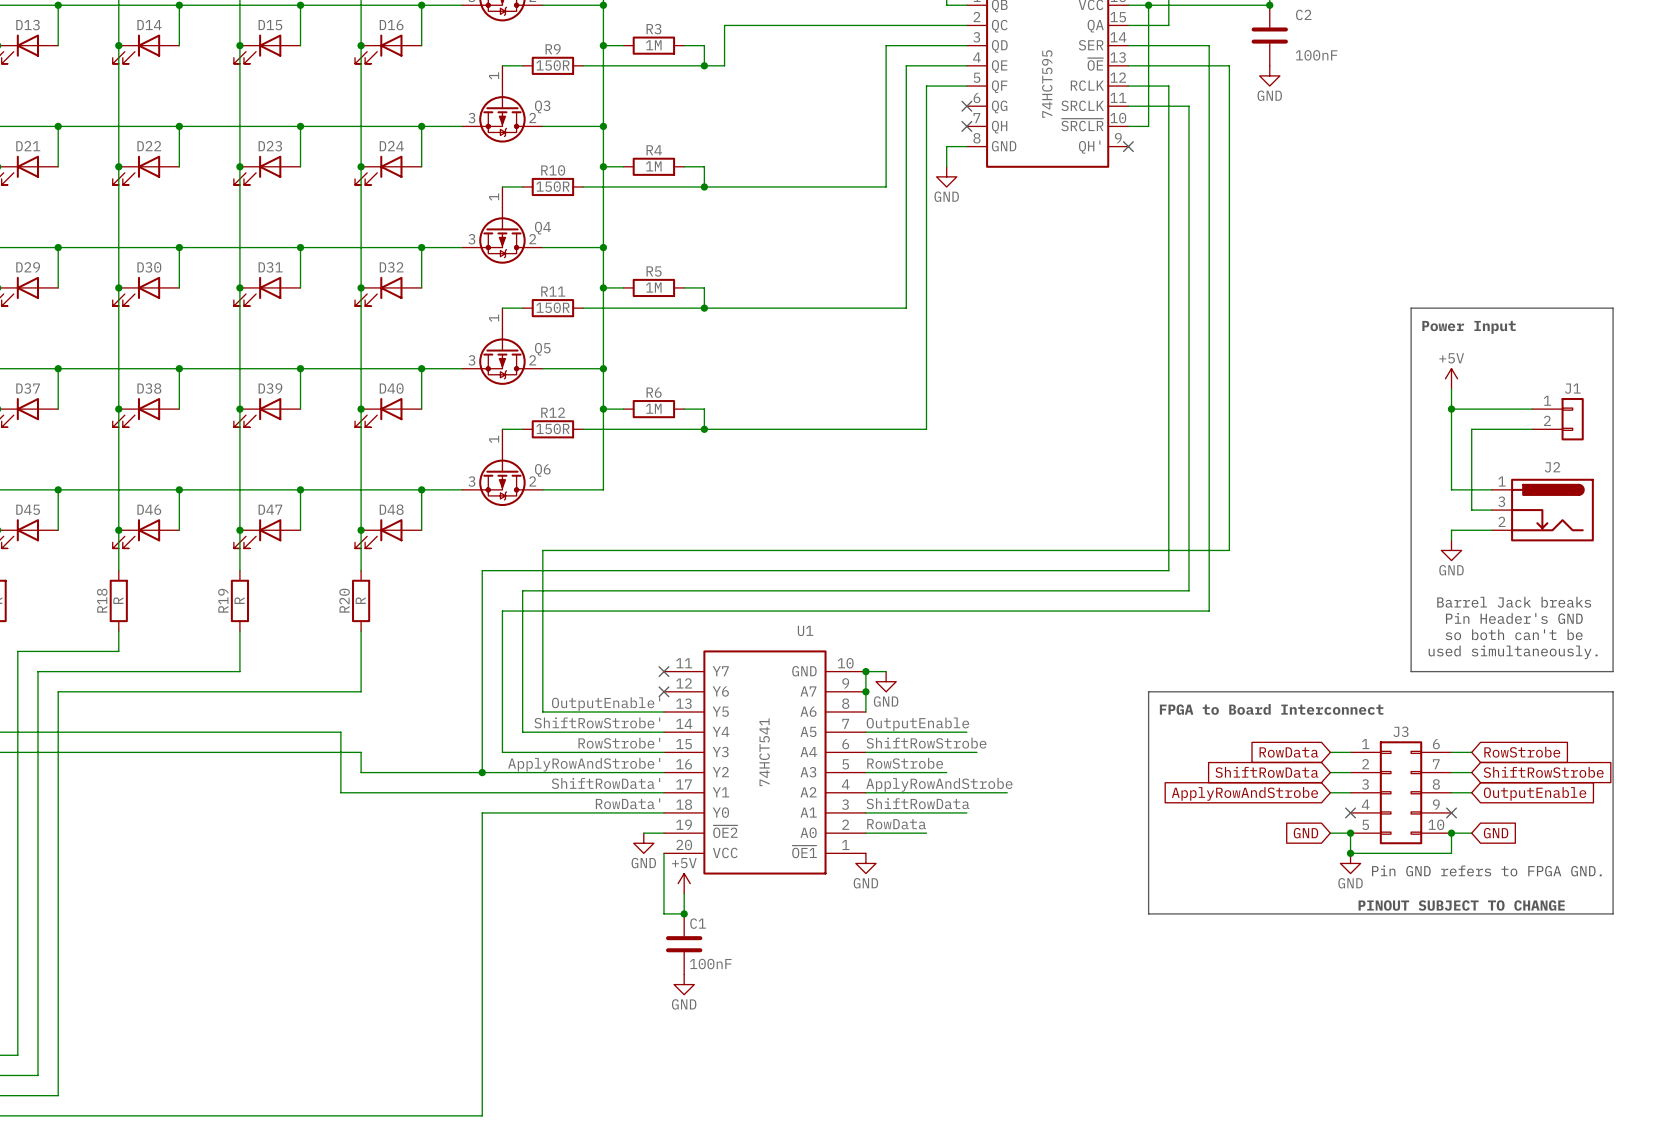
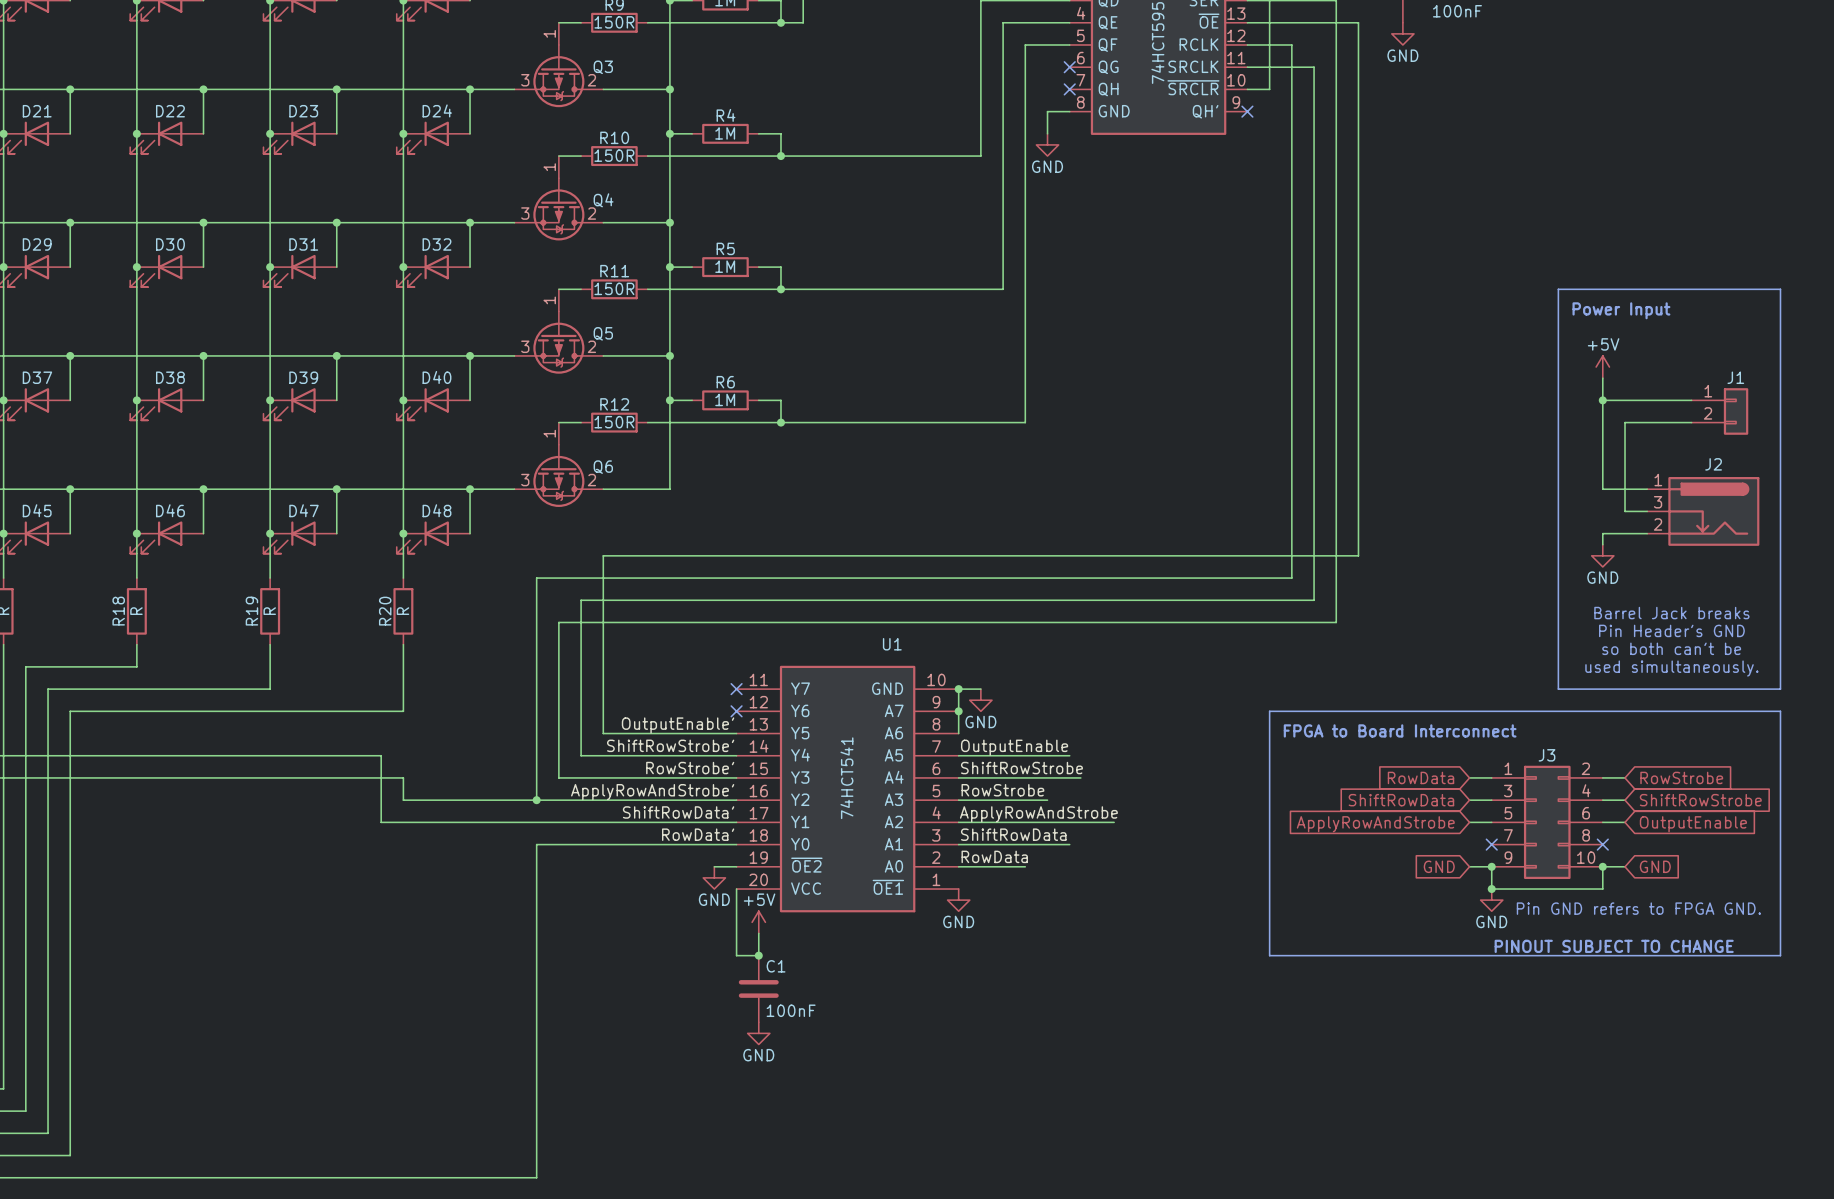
J3 pin number: 6 (1436, 744) -> 2 (1585, 768)
J3 pin number: 2 (1365, 764) -> 3 (1508, 791)
J3 pin number: 7 (1436, 764) -> 4 (1586, 790)
J3 pin number: 3 (1365, 784) -> 5 (1508, 813)
J3 pin number: 8 (1436, 784) -> 6 (1586, 813)
J3 pin number: 4 (1365, 804) -> 7 (1508, 835)
J3 pin number: 9 (1436, 804) -> 8 (1586, 835)
J3 pin number: 5 (1365, 824) -> 9 (1508, 857)

